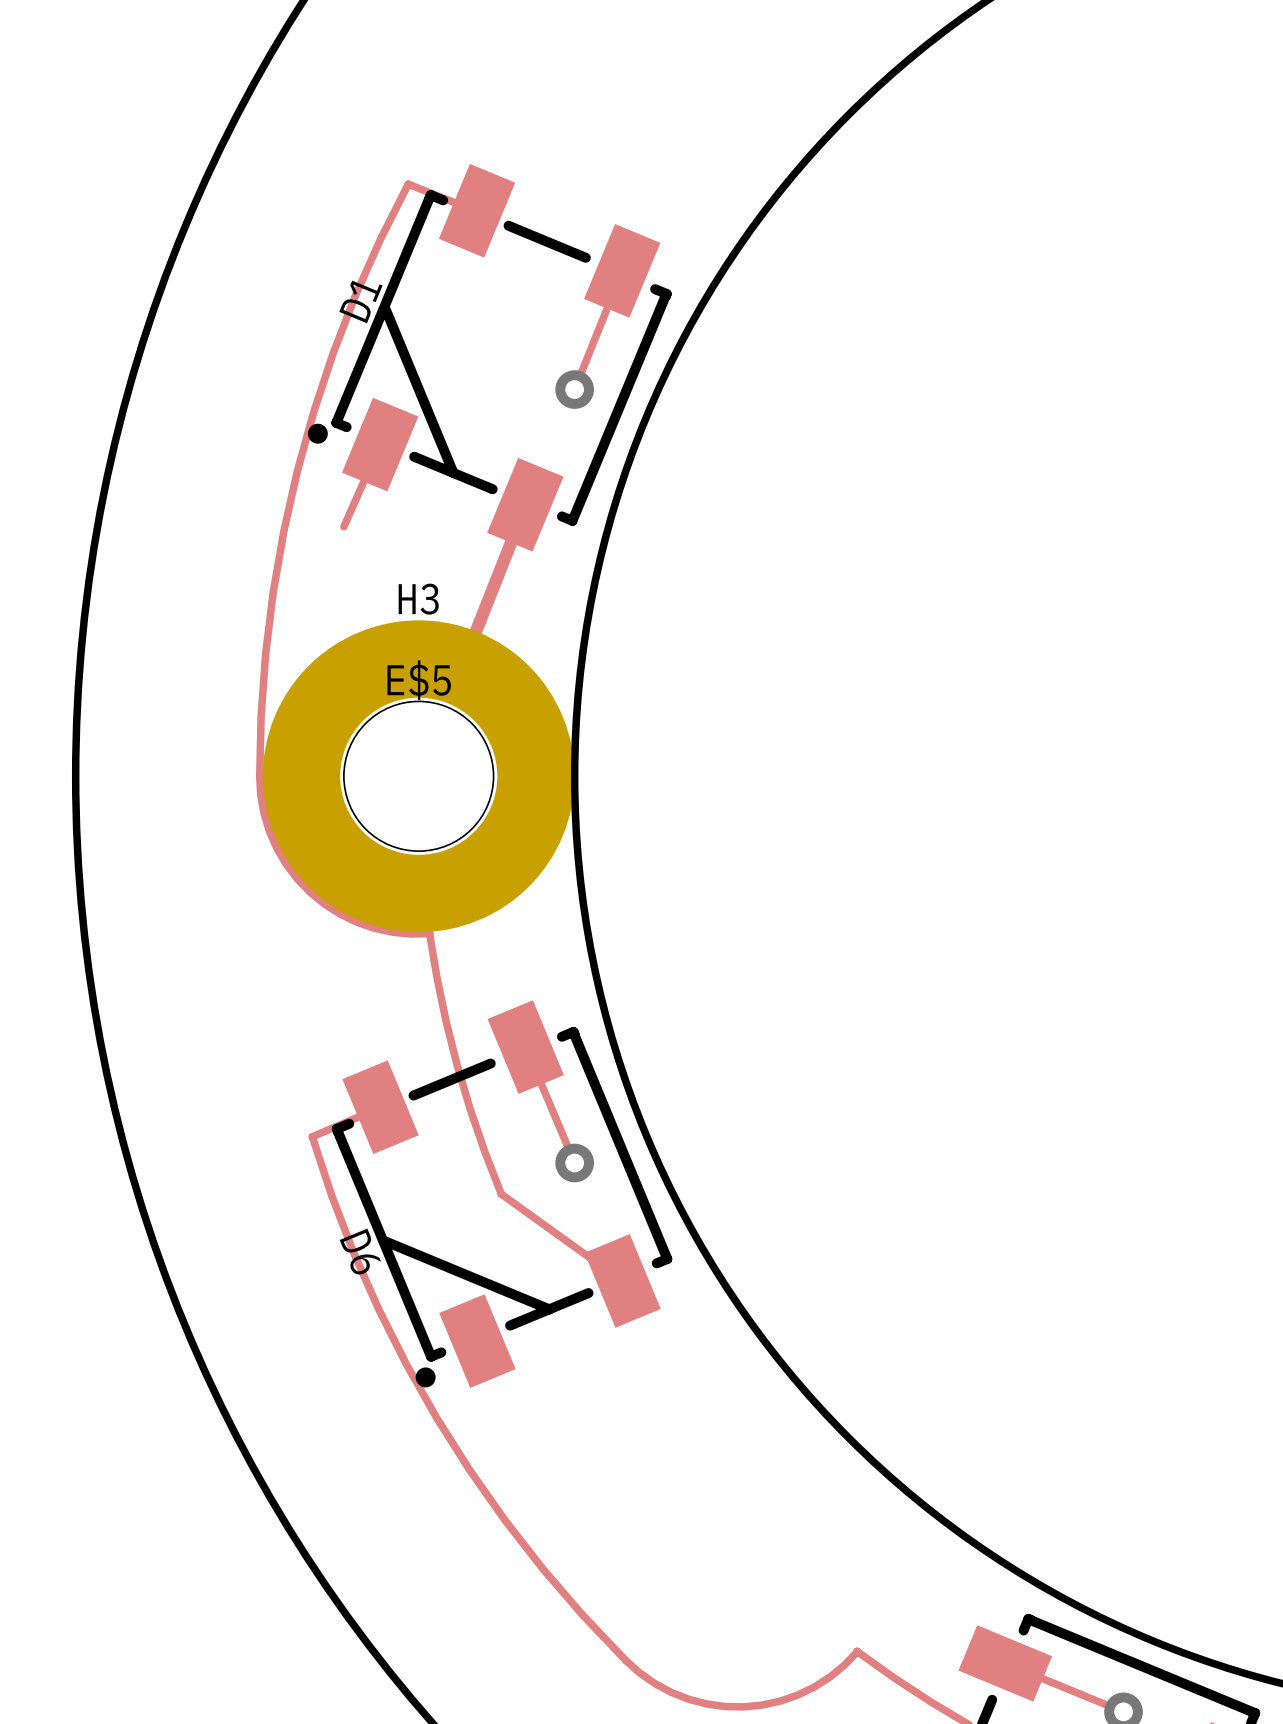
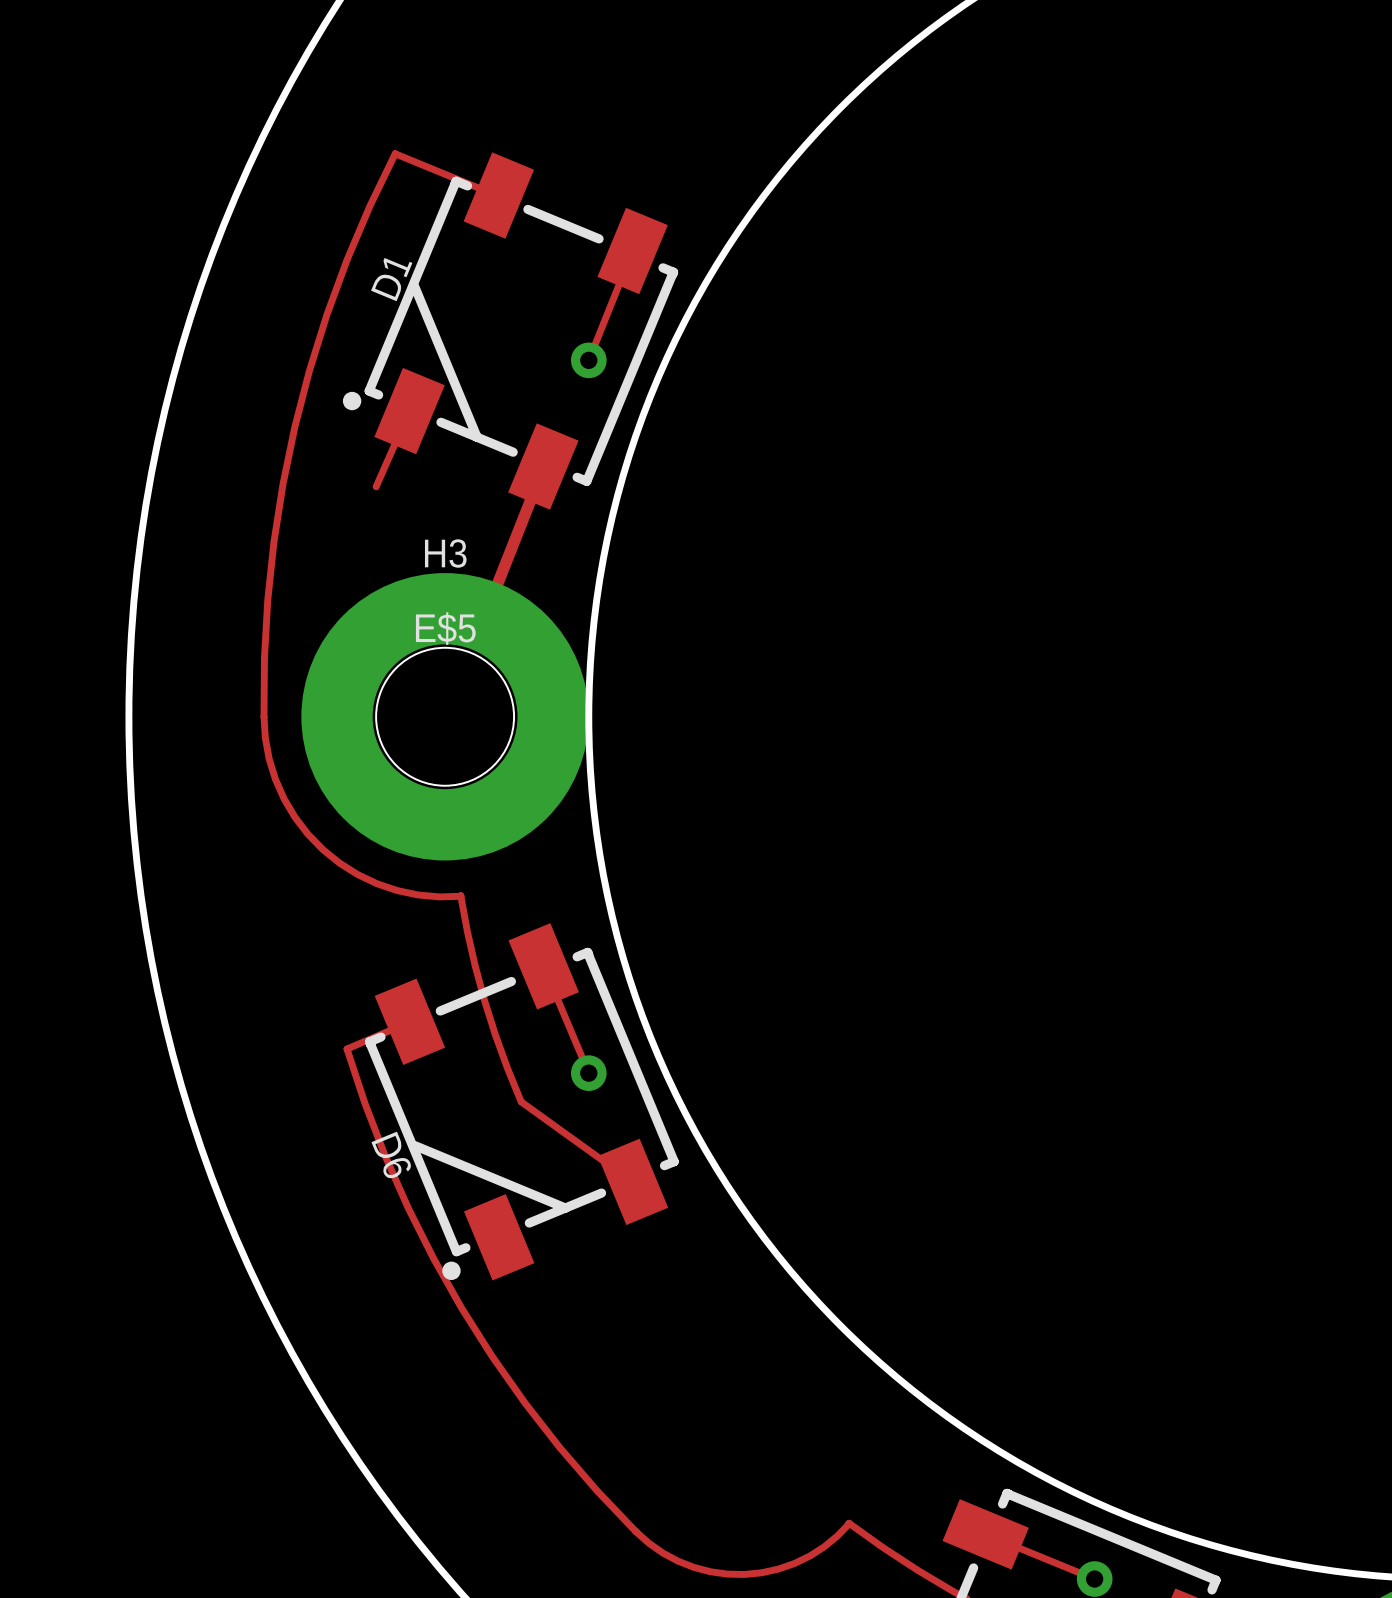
track: (476, 211) (408, 184) (380, 239) (355, 295) (333, 353) (313, 411) (297, 471) (283, 531) (273, 591) (265, 653) (261, 714) (259, 776) (263, 813) (276, 847) (297, 878) (324, 904) (356, 922) (392, 932) (429, 933) -> (498, 196) (395, 153) (347, 260) (309, 370) (294, 427) (273, 542) (264, 658) (264, 716) (269, 759) (284, 799) (308, 834) (339, 863) (377, 883) (418, 894) (460, 896)
track: (429, 933) (446, 1021) (457, 1065) (484, 1151) (501, 1193) -> (460, 895) (484, 1000) (521, 1101)

